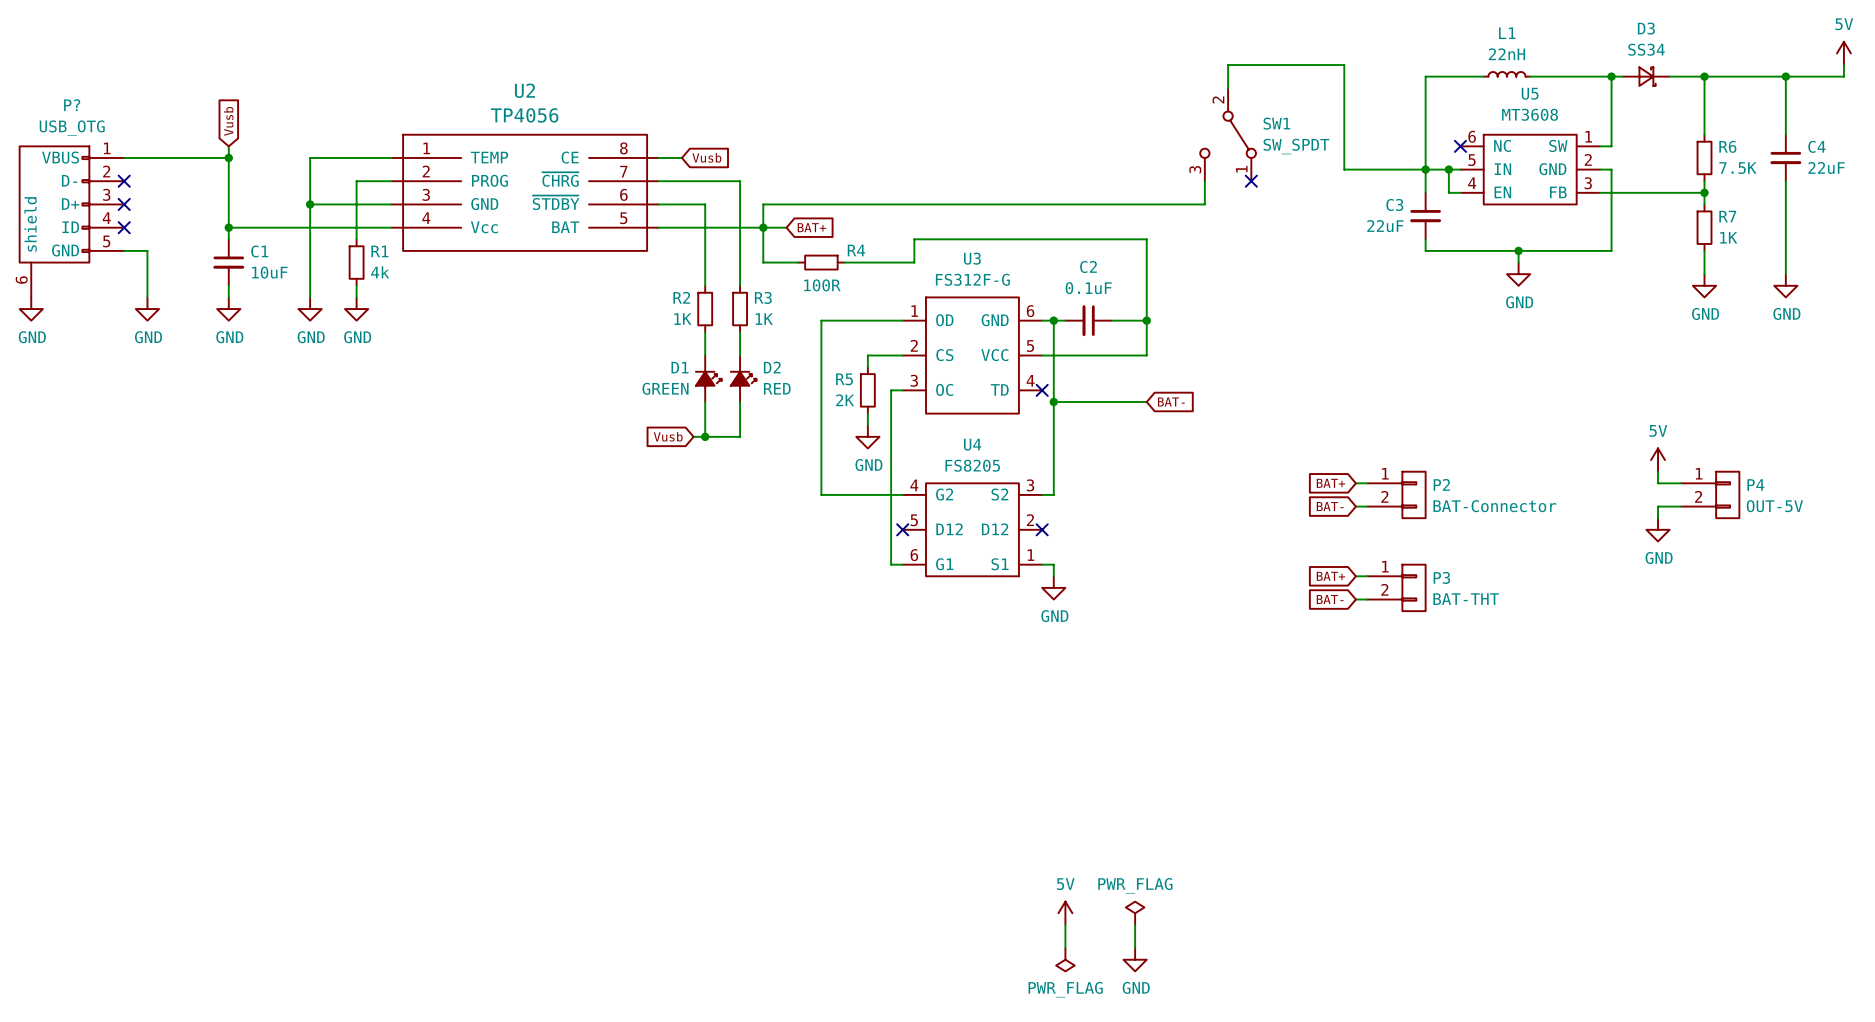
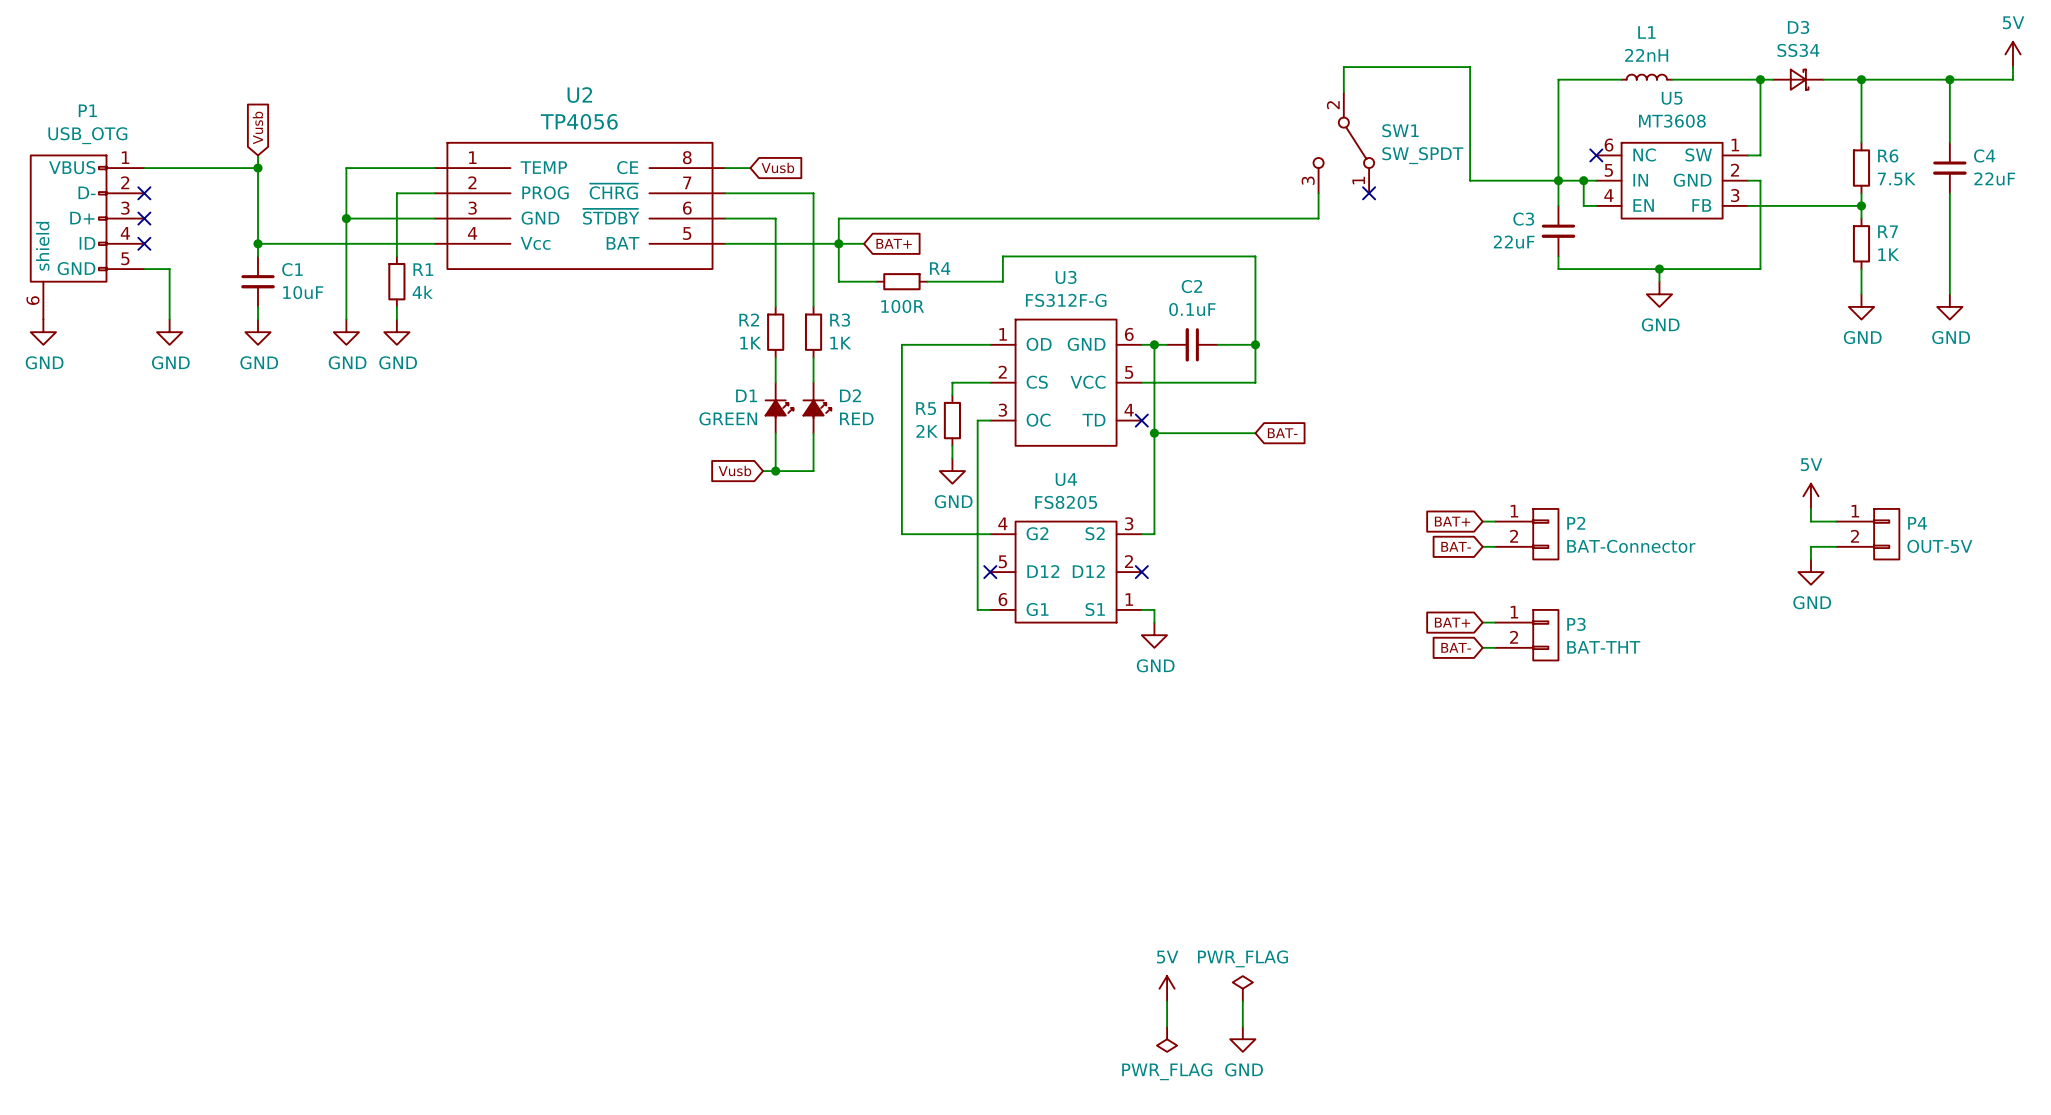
P? name: P? (72, 105) -> P1 (87, 110)

